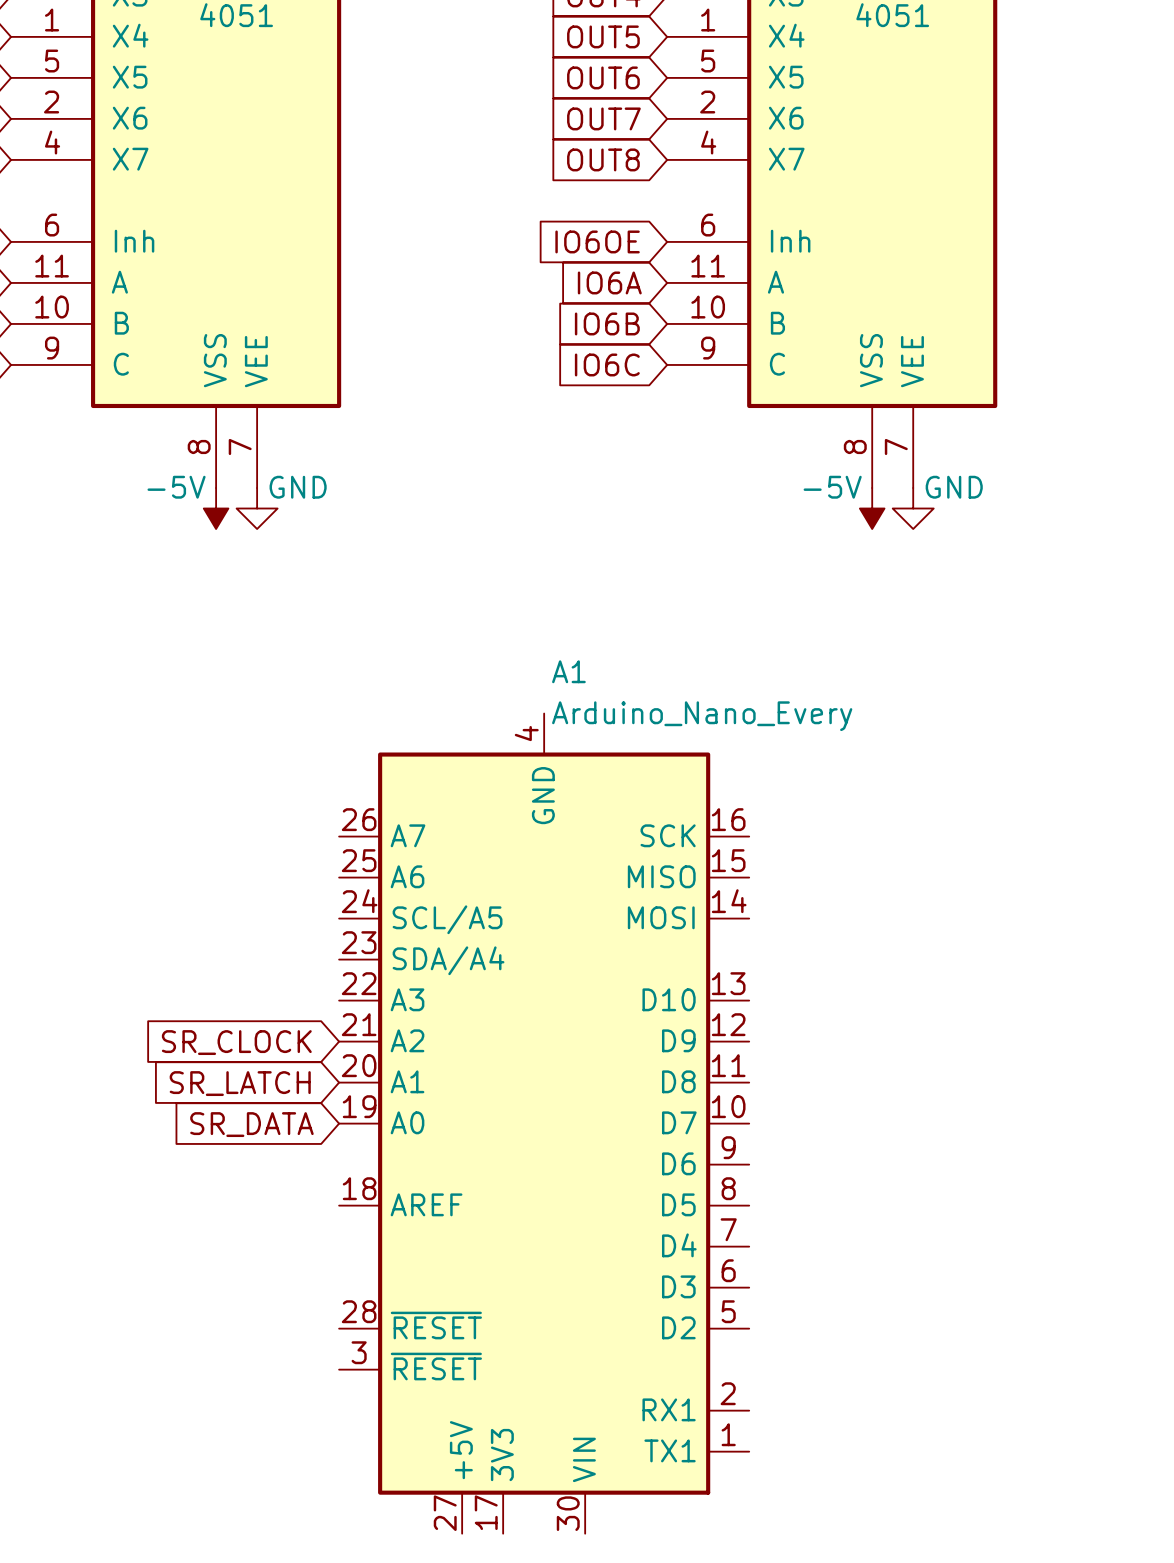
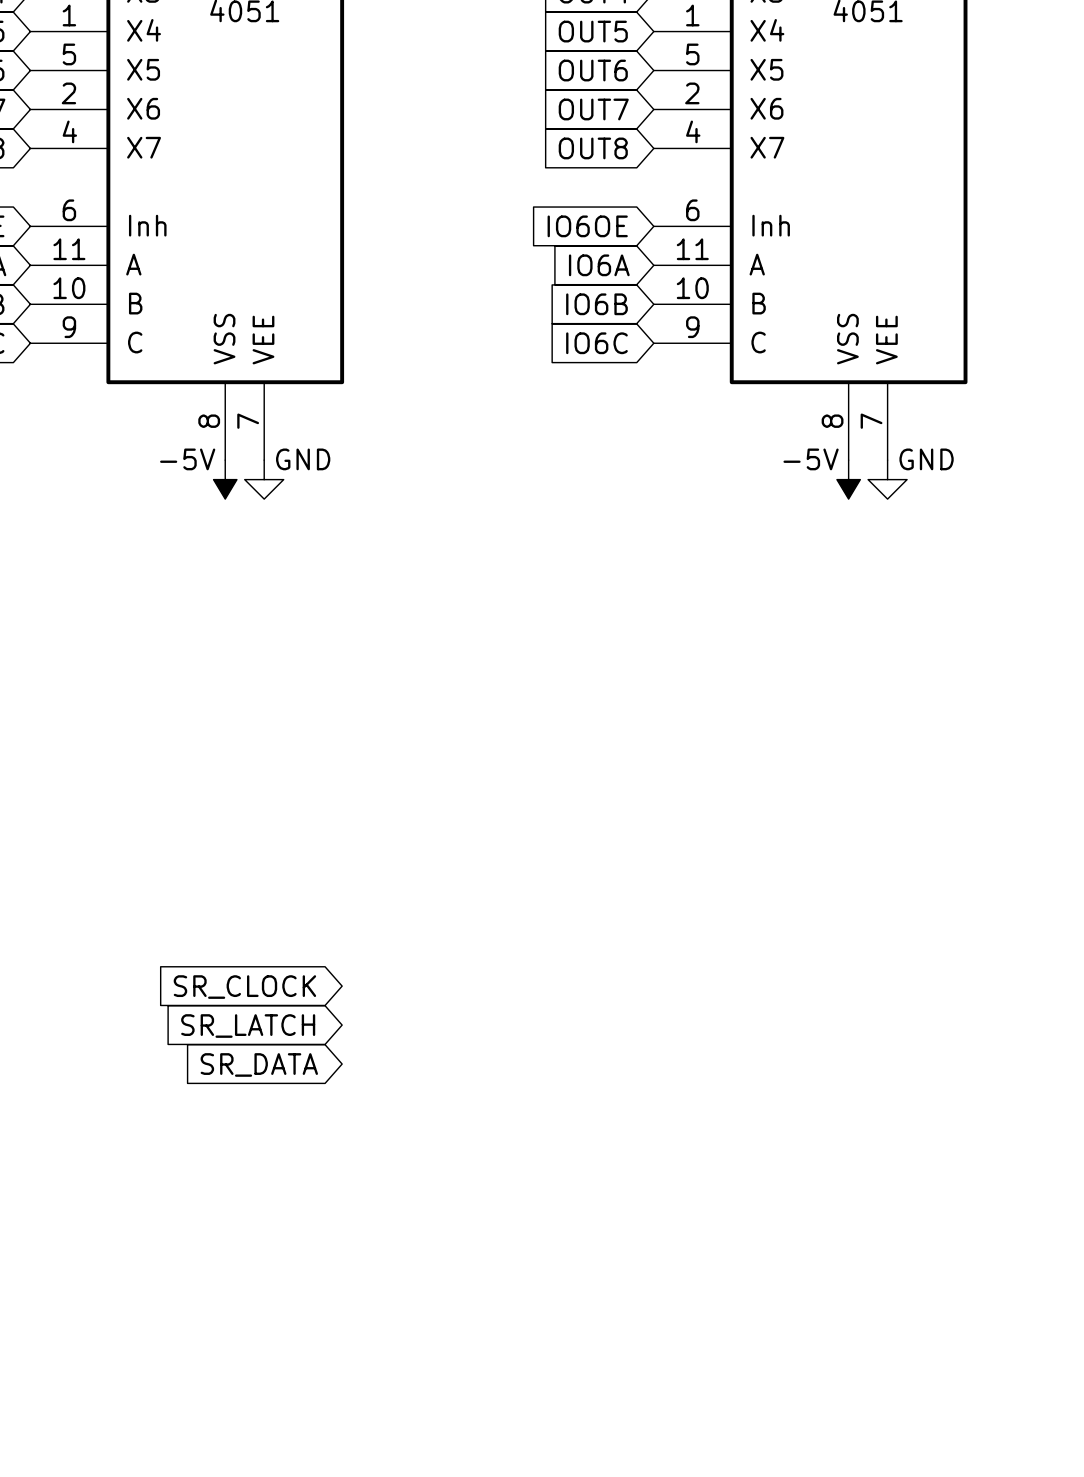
A1: Arduino_Nano_Every (544, 1123) -> none

